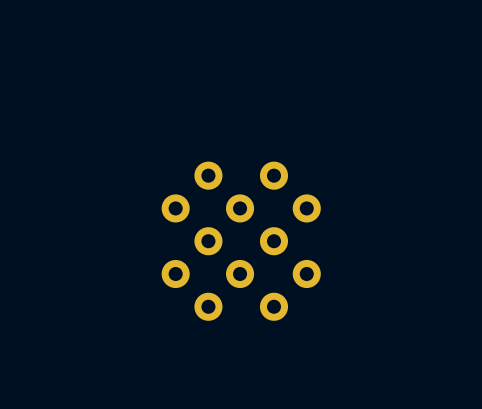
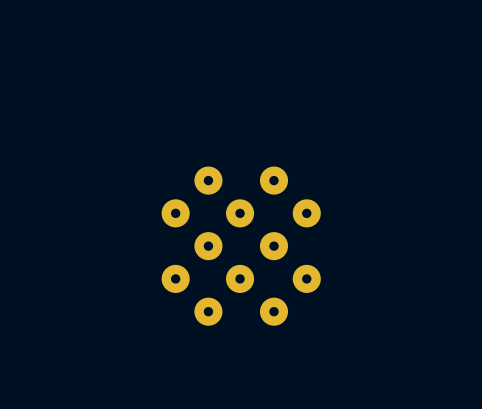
part footprint: [161, 161, 321, 321] -> [161, 166, 321, 326]

